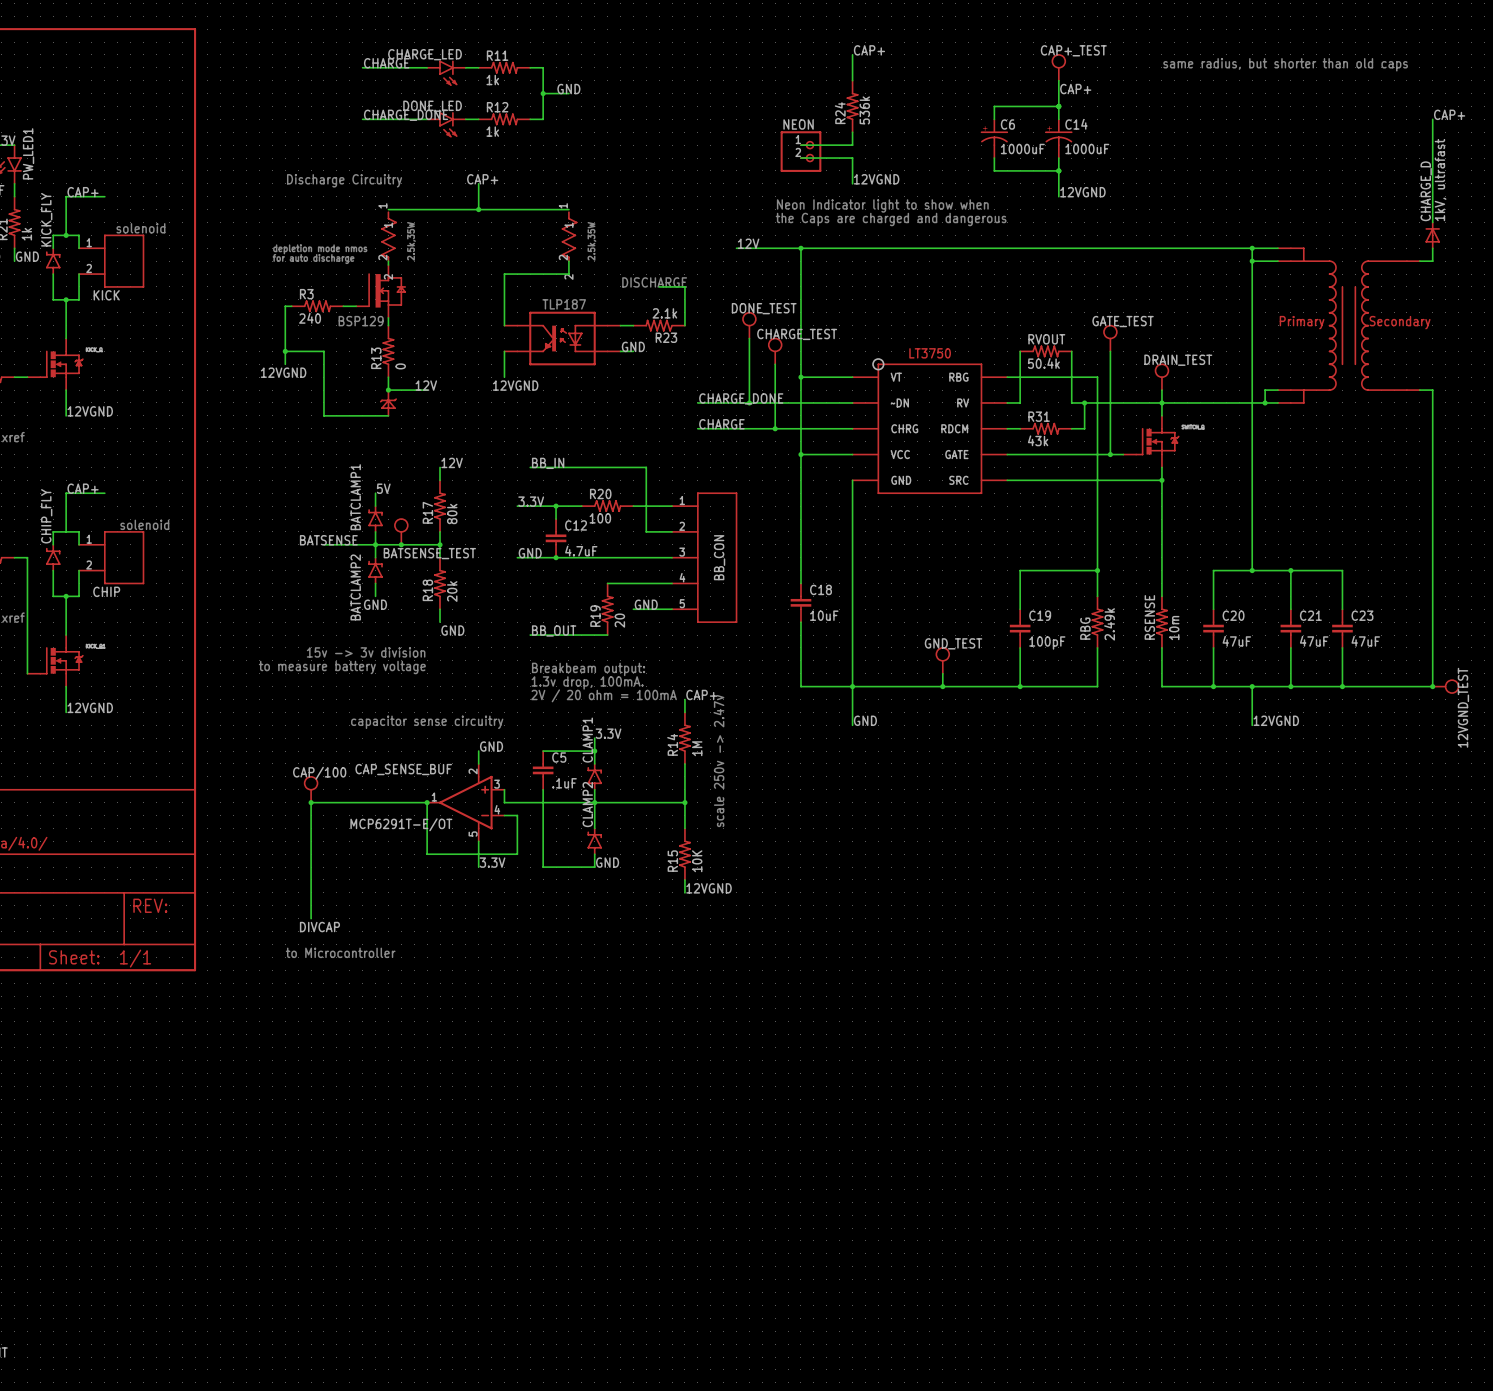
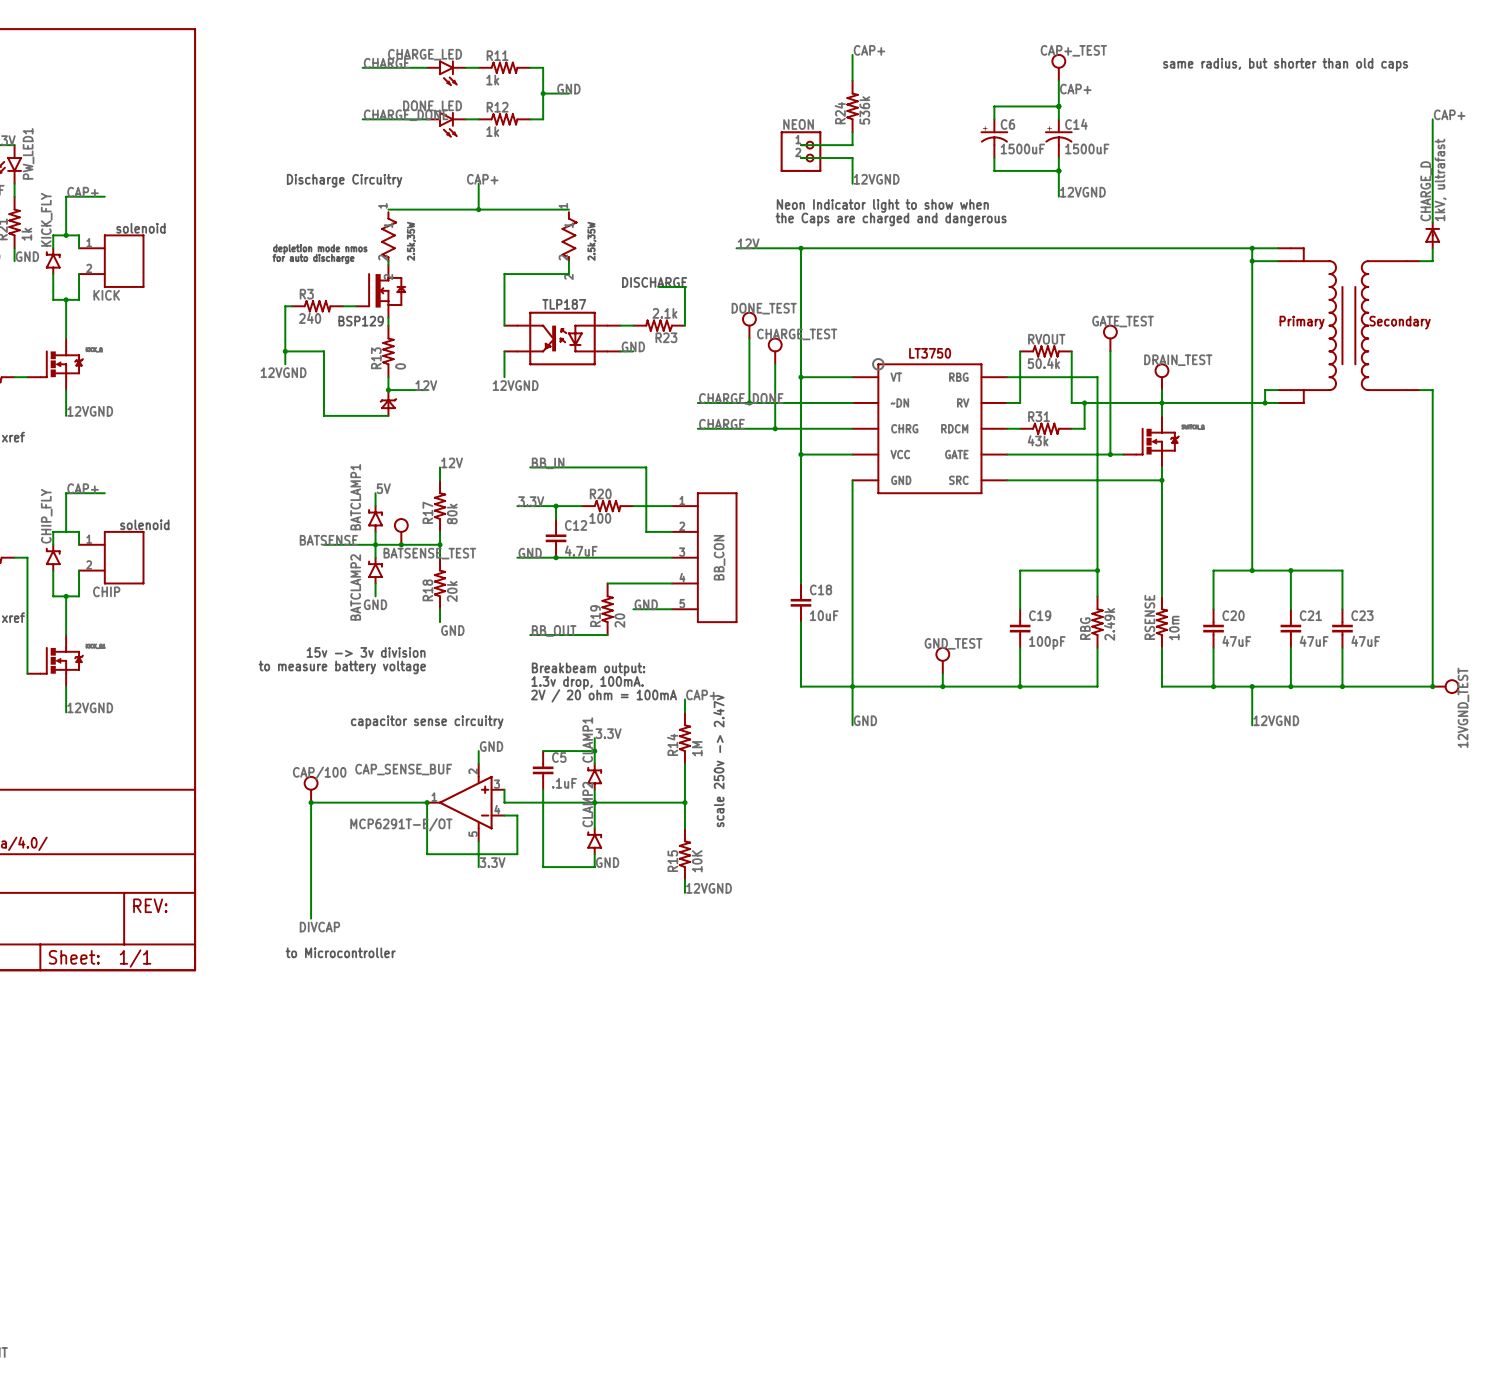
C6 value: 1000uF (1022, 149) -> 1500uF (1022, 149)
C14 value: 1000uF (1087, 149) -> 1500uF (1087, 149)

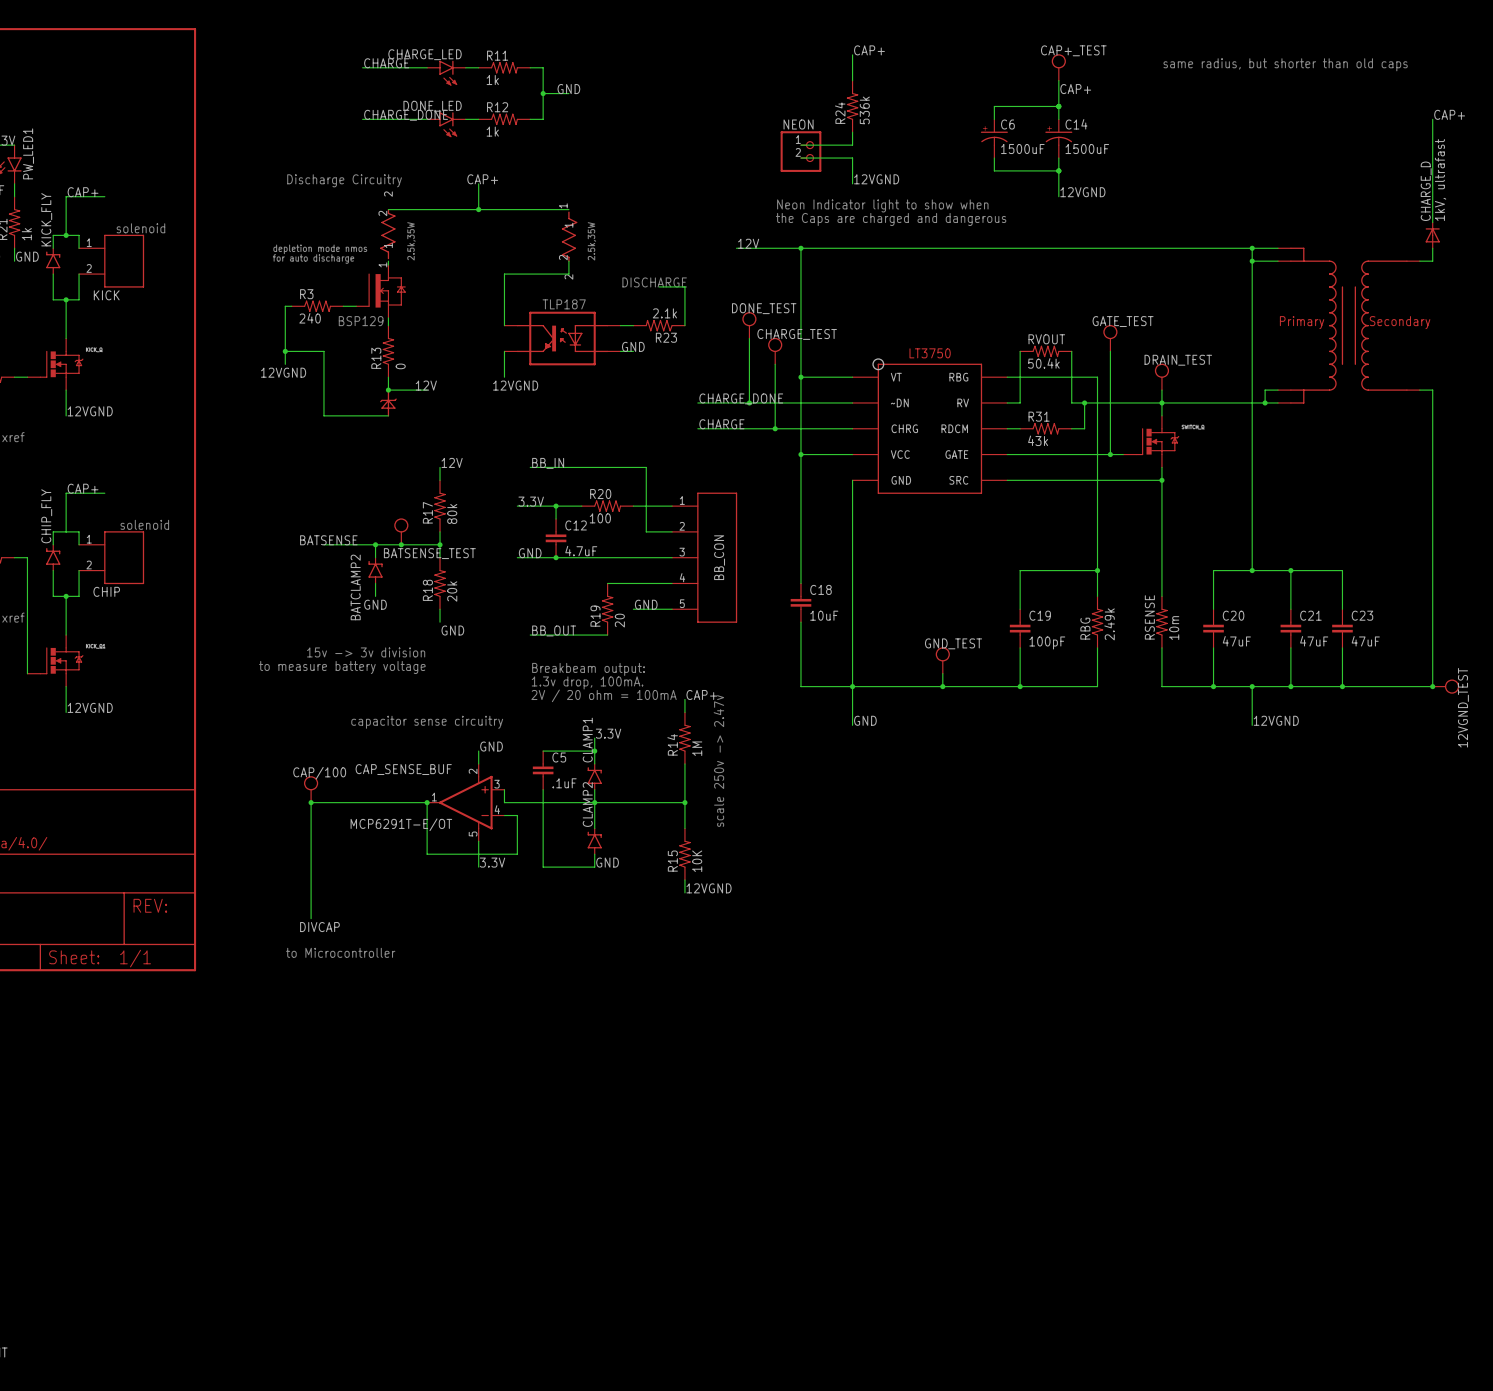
part rotation: 0° (389, 236) -> 180° (387, 234)
label: 5V (383, 488) -> none
wire: (375, 493) (375, 506) -> none
BATCLAMP1: (375, 519) -> none
wire: (375, 531) (375, 544) -> none

